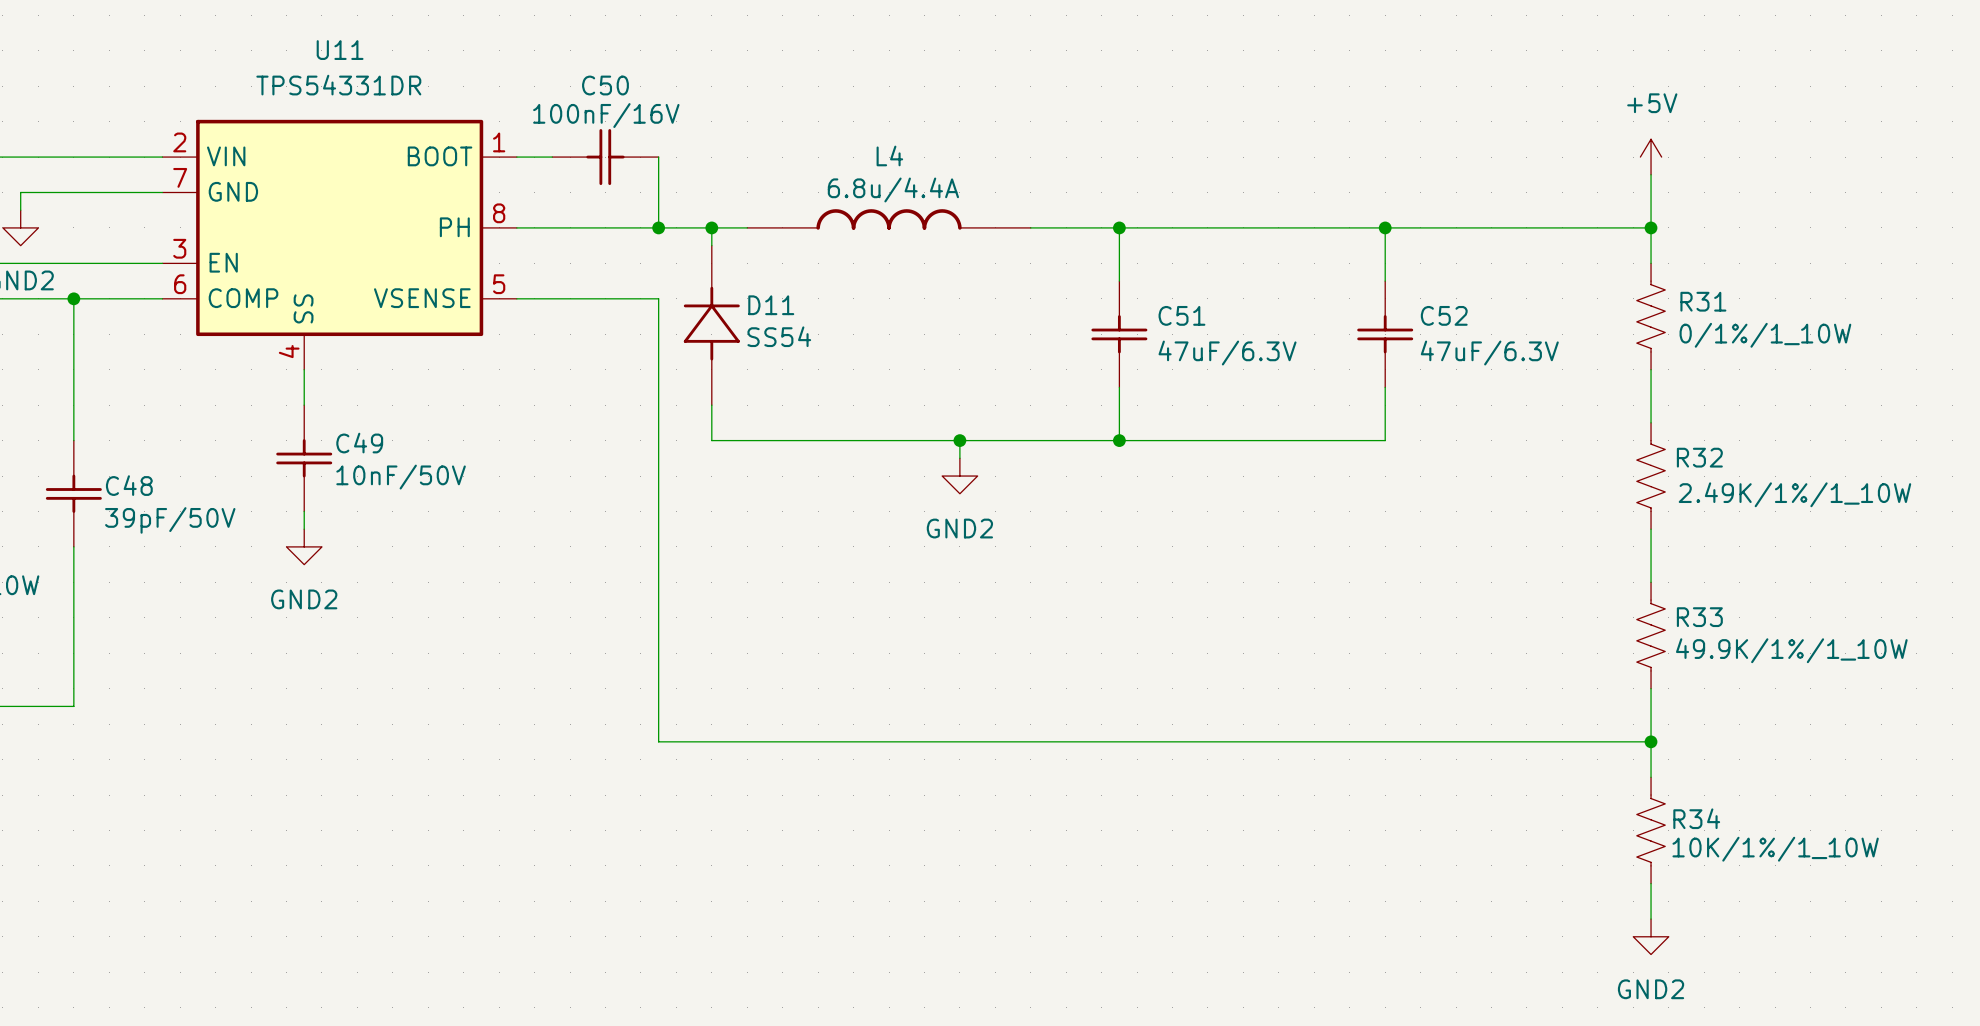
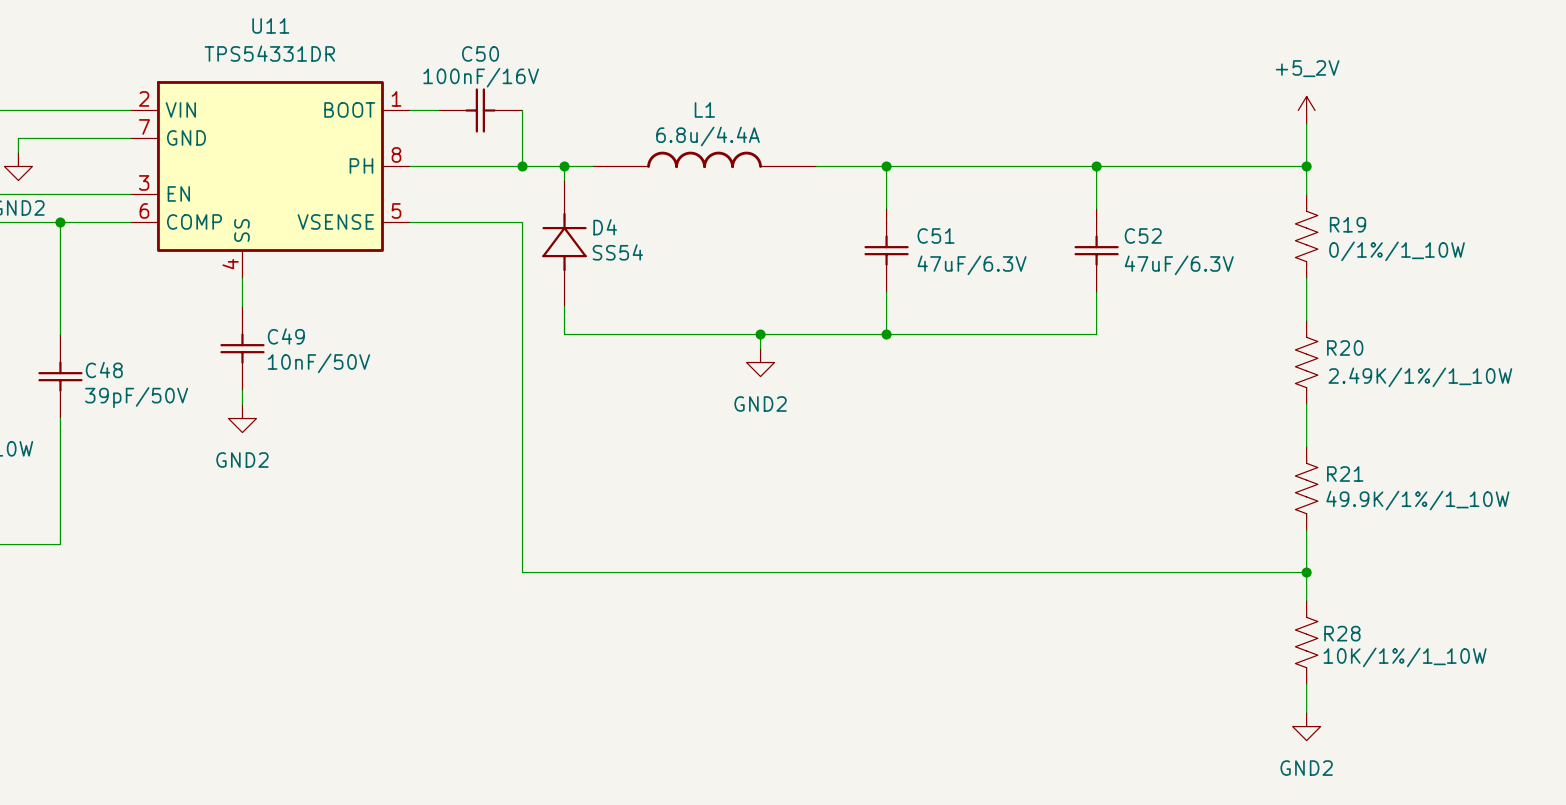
L4 name: L4 (889, 155) -> L1 (704, 109)
power symbol: +5V (1651, 157) -> +5_2V (1306, 110)
R31 name: R31 (1703, 301) -> R19 (1348, 224)
D11 name: D11 (771, 305) -> D4 (605, 227)
R32 name: R32 (1699, 457) -> R20 (1345, 347)
R33 name: R33 (1699, 617) -> R21 (1345, 474)
R34 name: R34 (1696, 818) -> R28 (1342, 633)

